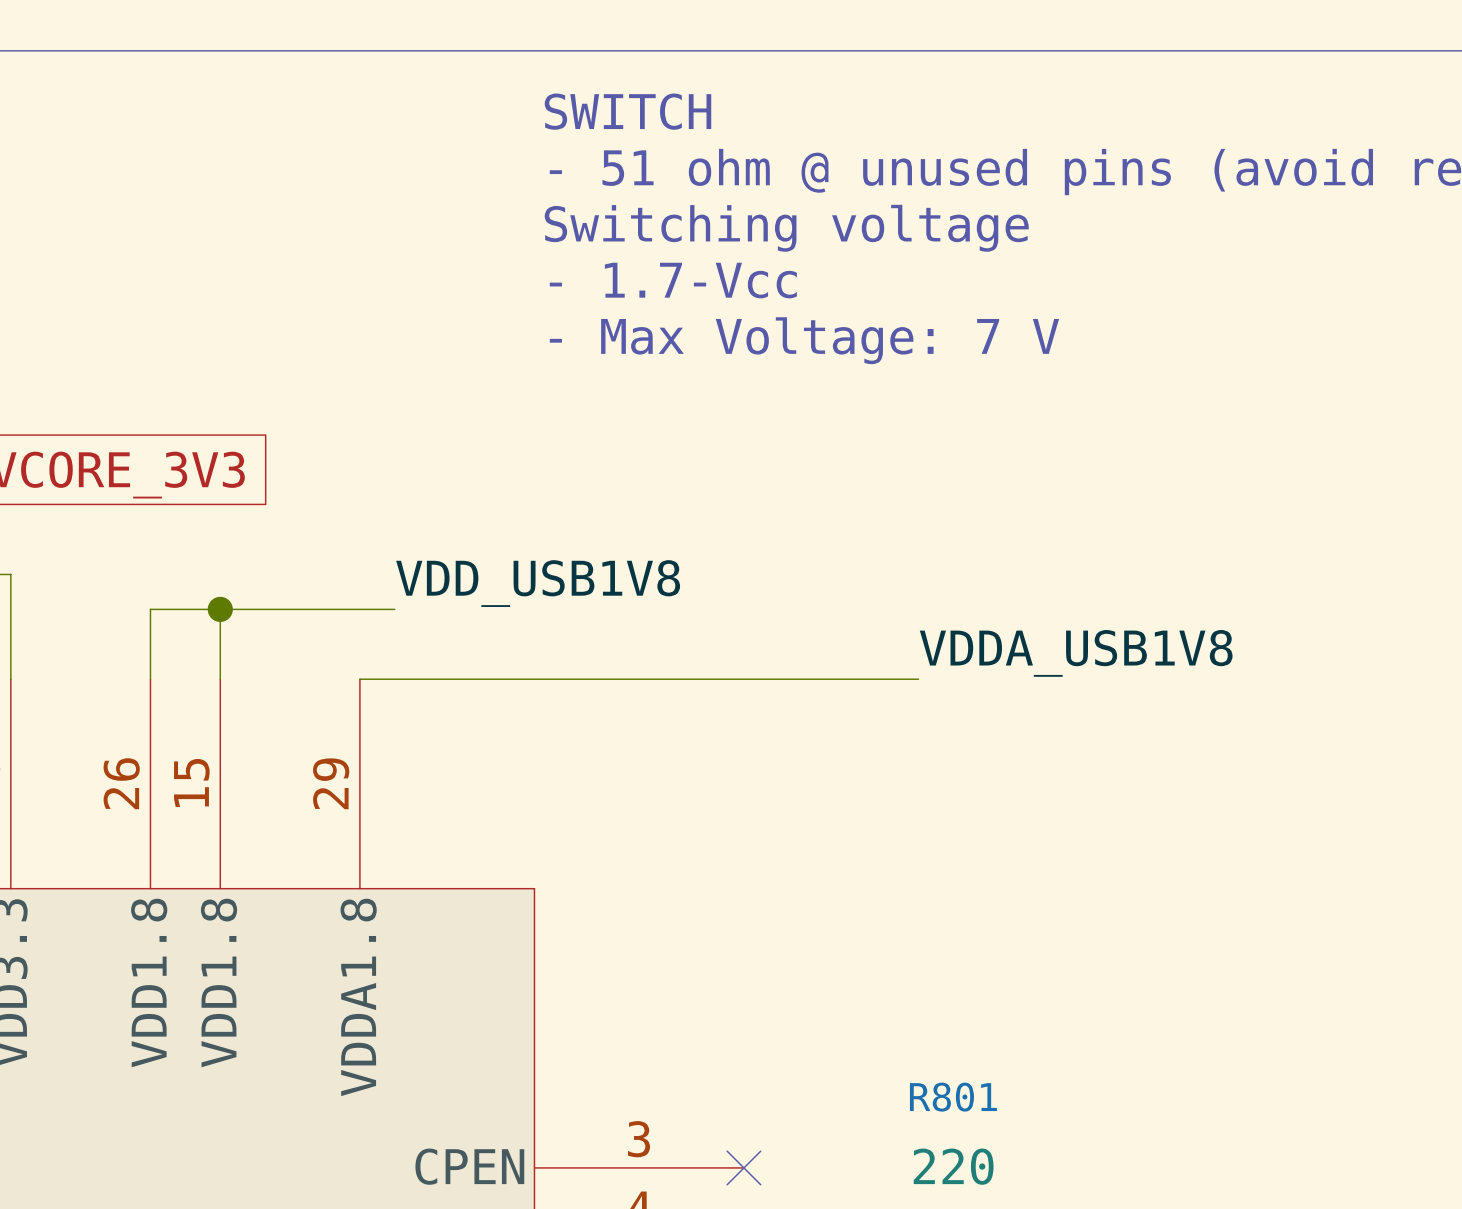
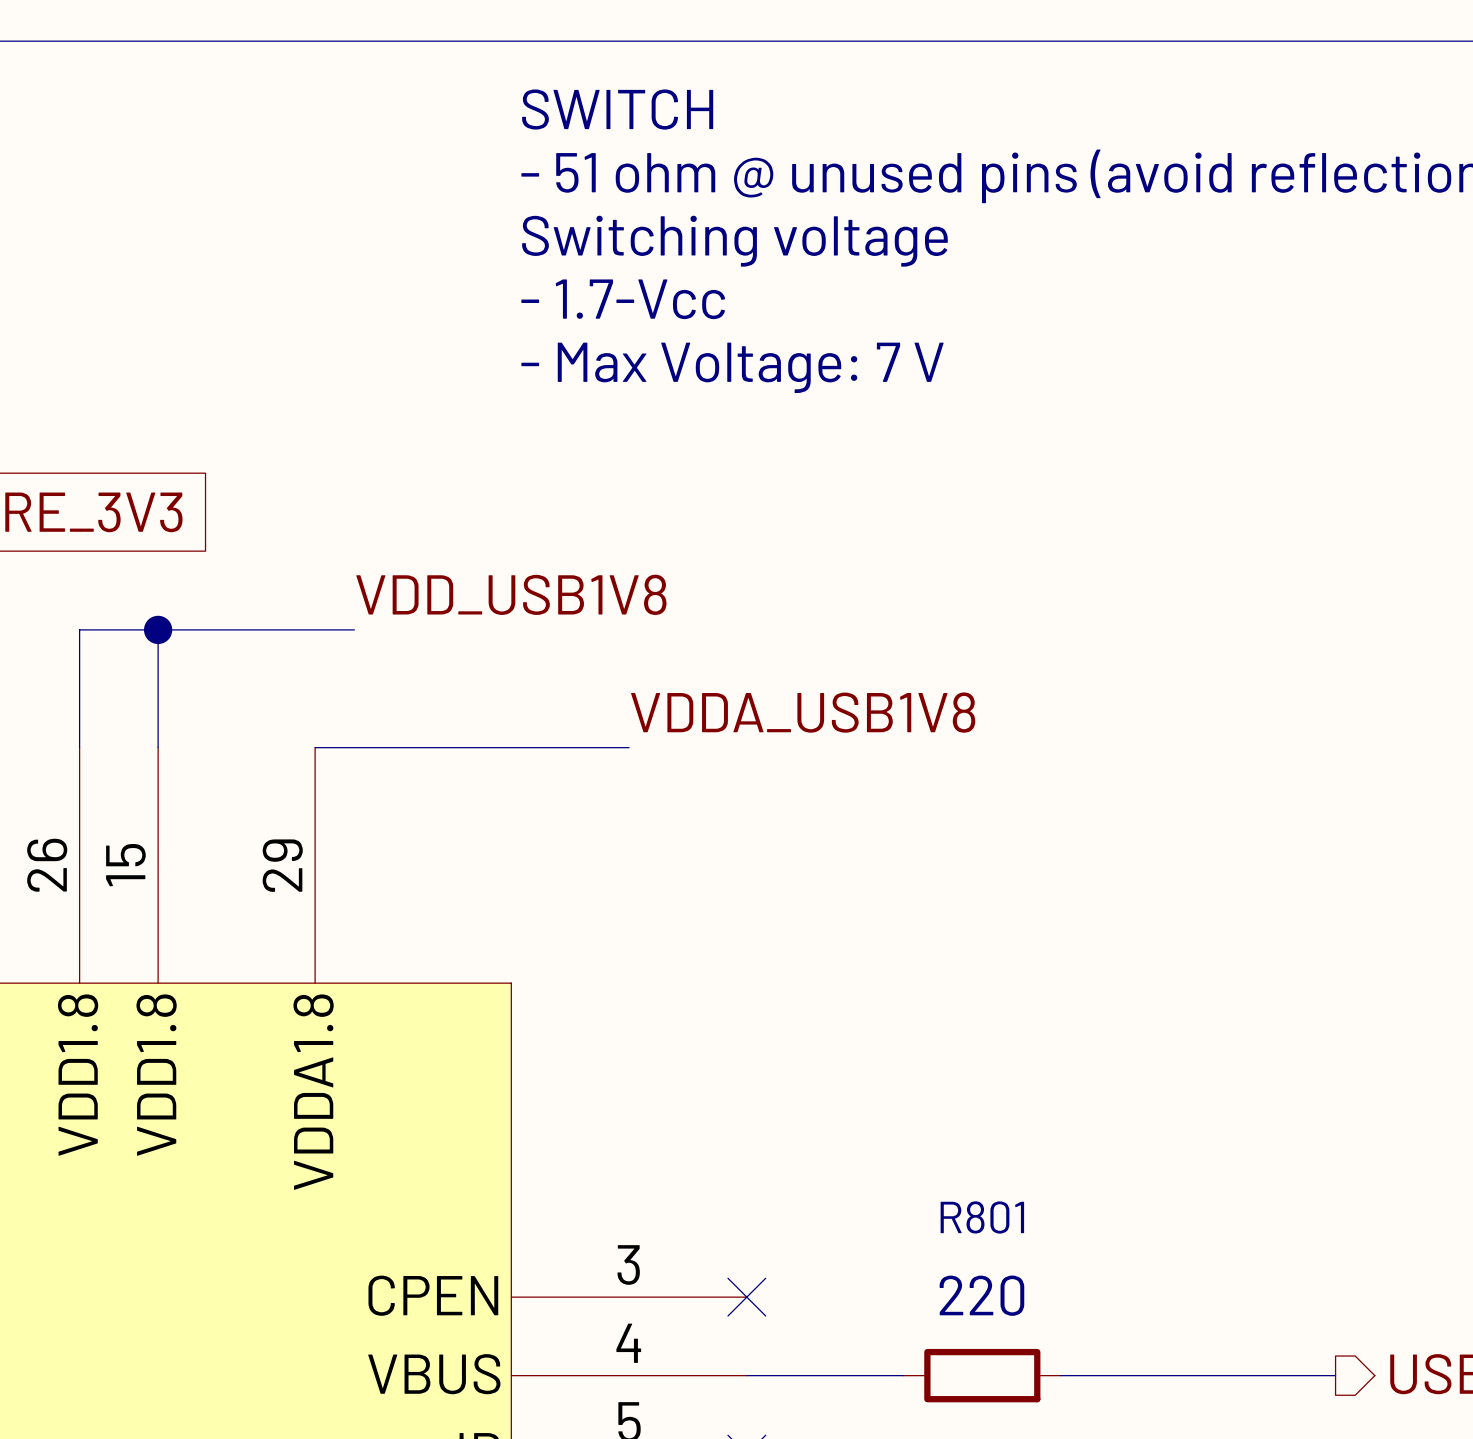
wire: none -> (158, 629) (158, 669)
label position: VDD_USB1V8 (538, 583) -> VDD_USB1V8 (511, 594)
wire: (150, 609) (394, 609) -> (79, 669) (79, 629) (354, 629)
junction position: (220, 609) -> (158, 629)
label position: VDDA_USB1V8 (1076, 653) -> VDDA_USB1V8 (803, 712)
wire: (639, 679) (918, 679) -> none

